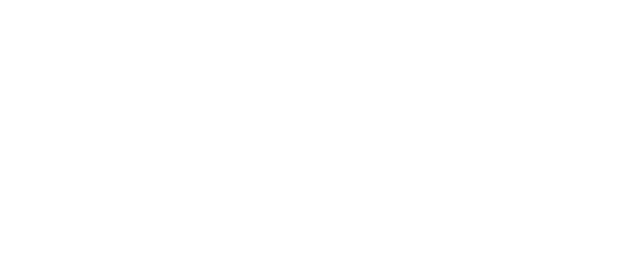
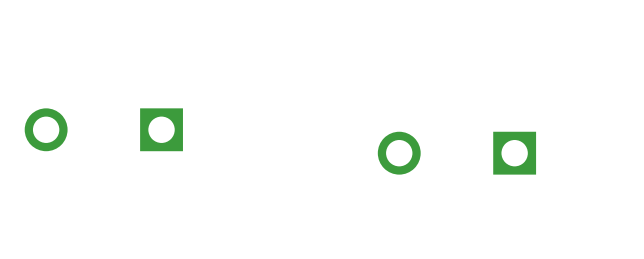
part: none -> (103, 129)
part: none -> (456, 153)

